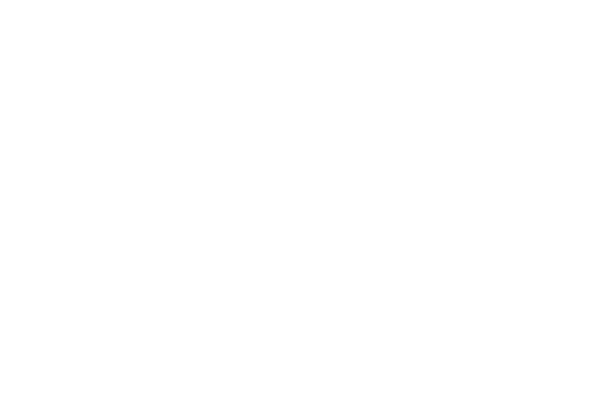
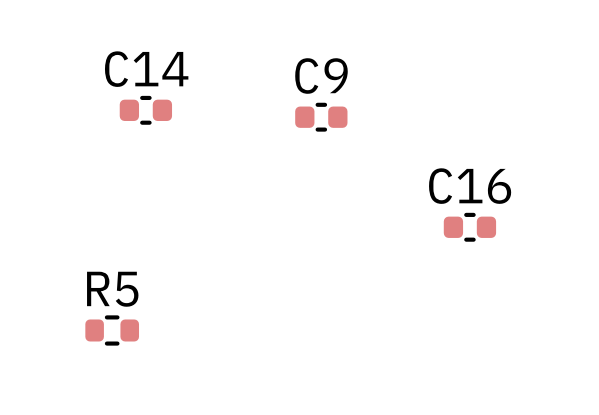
C14: none -> (145, 110)
C9: none -> (321, 117)
C16: none -> (469, 227)
R5: none -> (112, 330)

